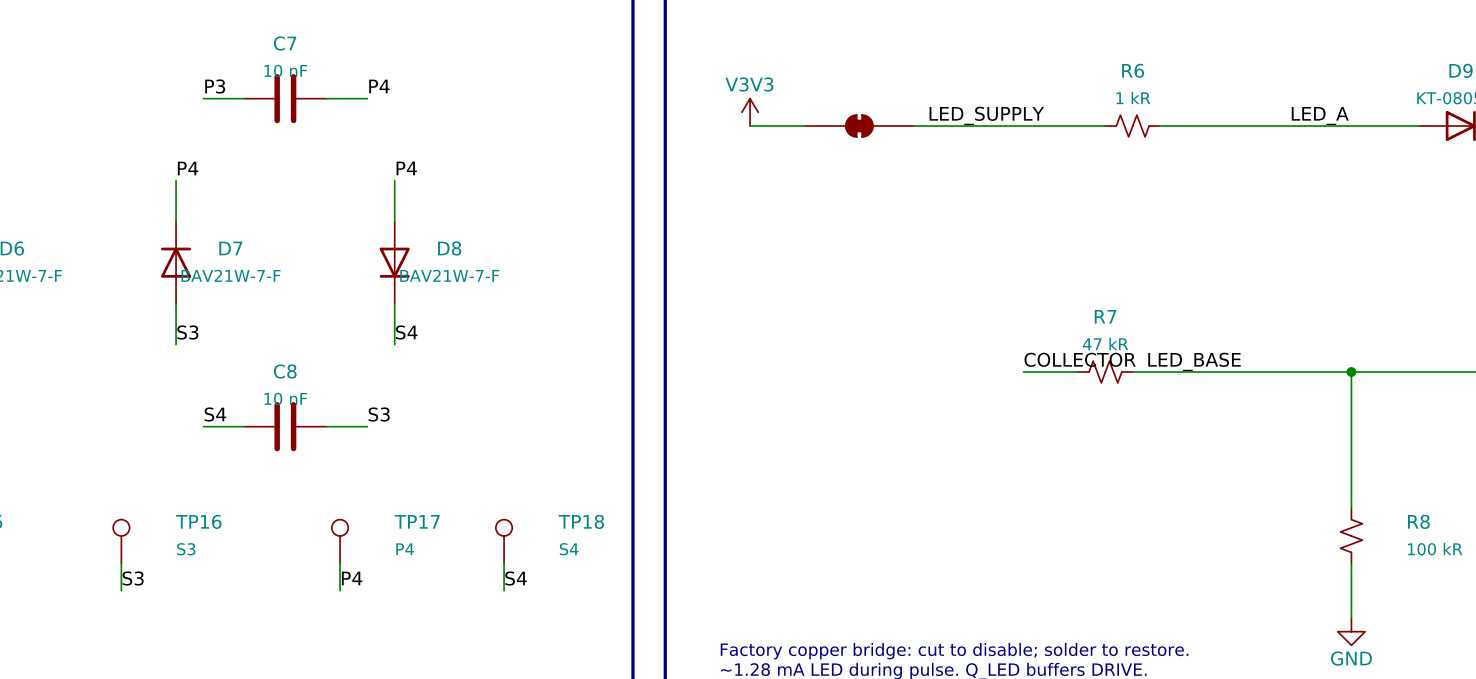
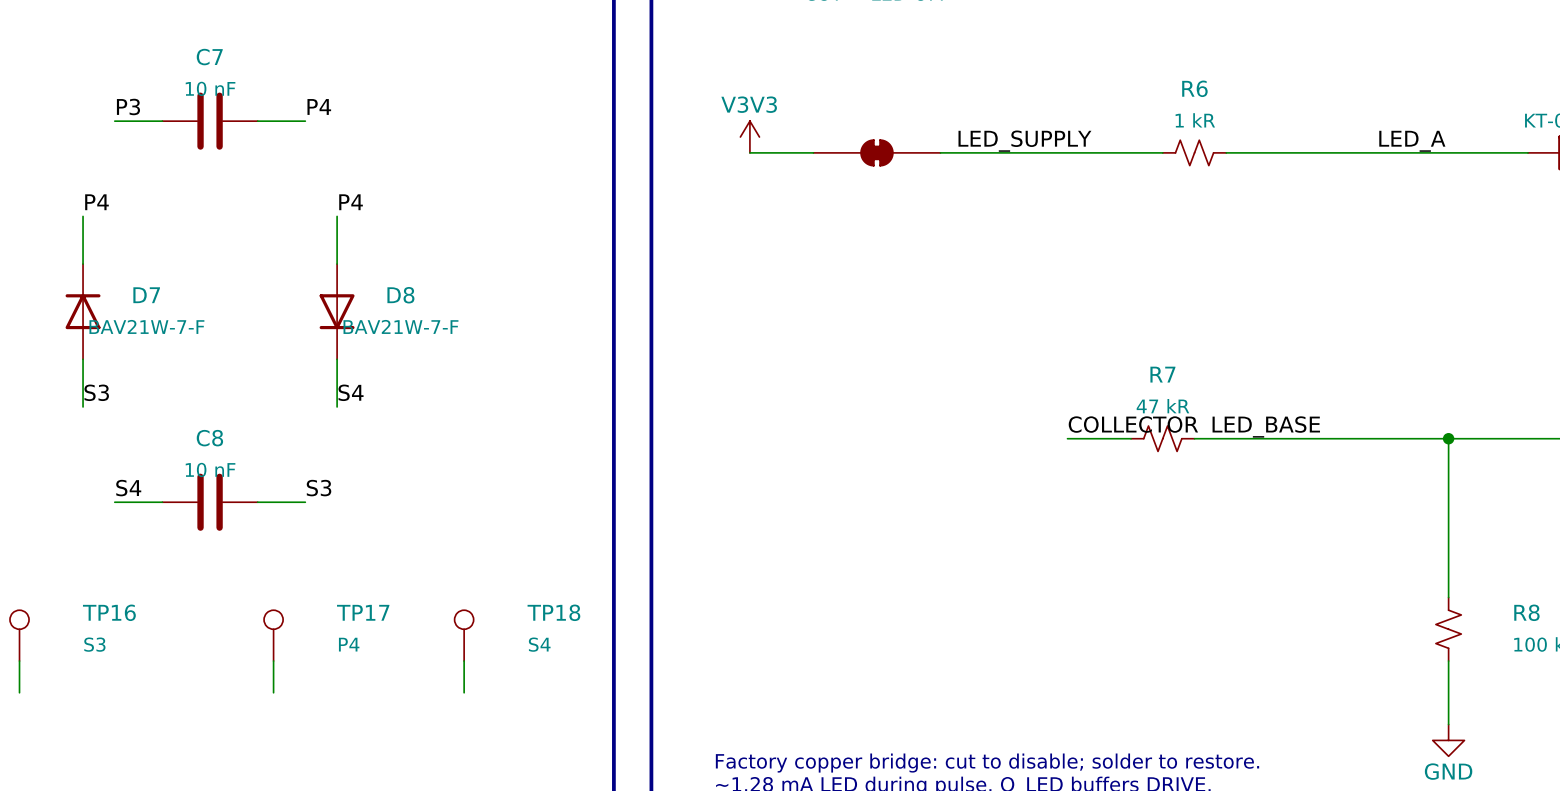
label: S3 (133, 578) -> none
label: P4 (352, 578) -> none
label: S4 (516, 578) -> none

